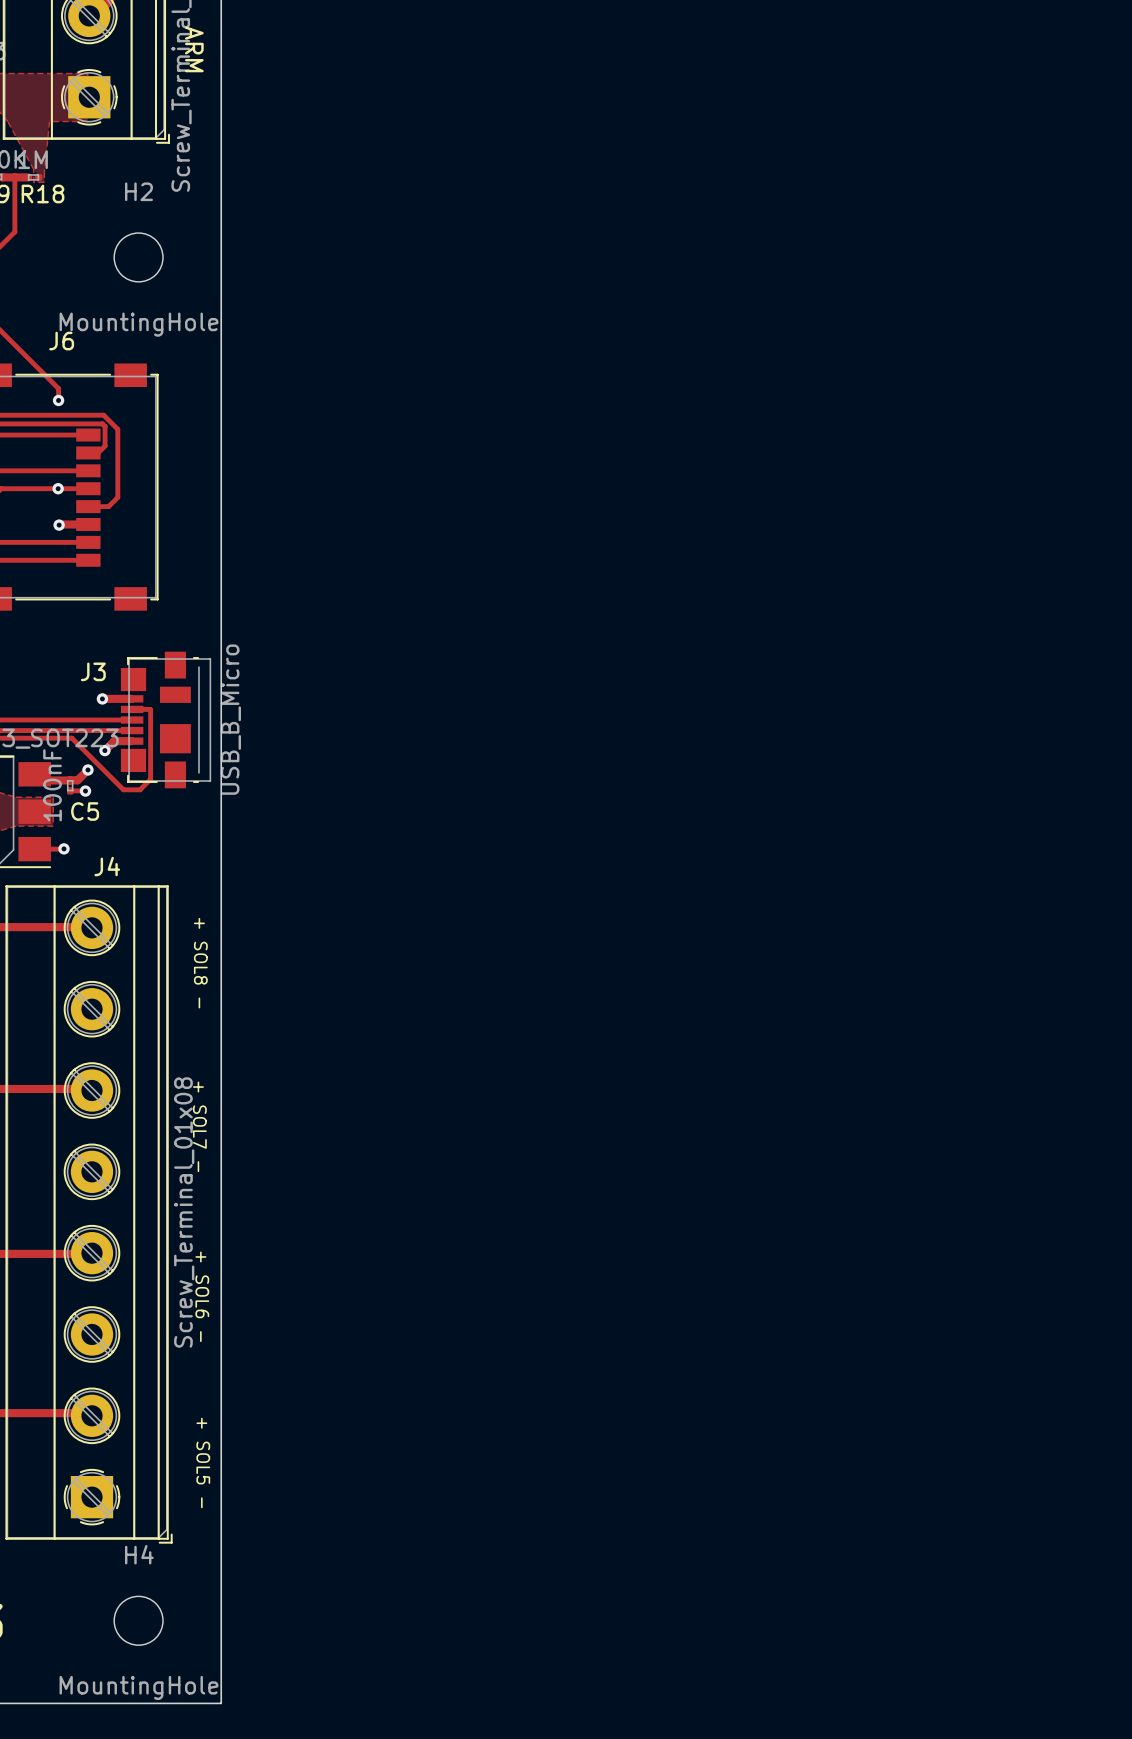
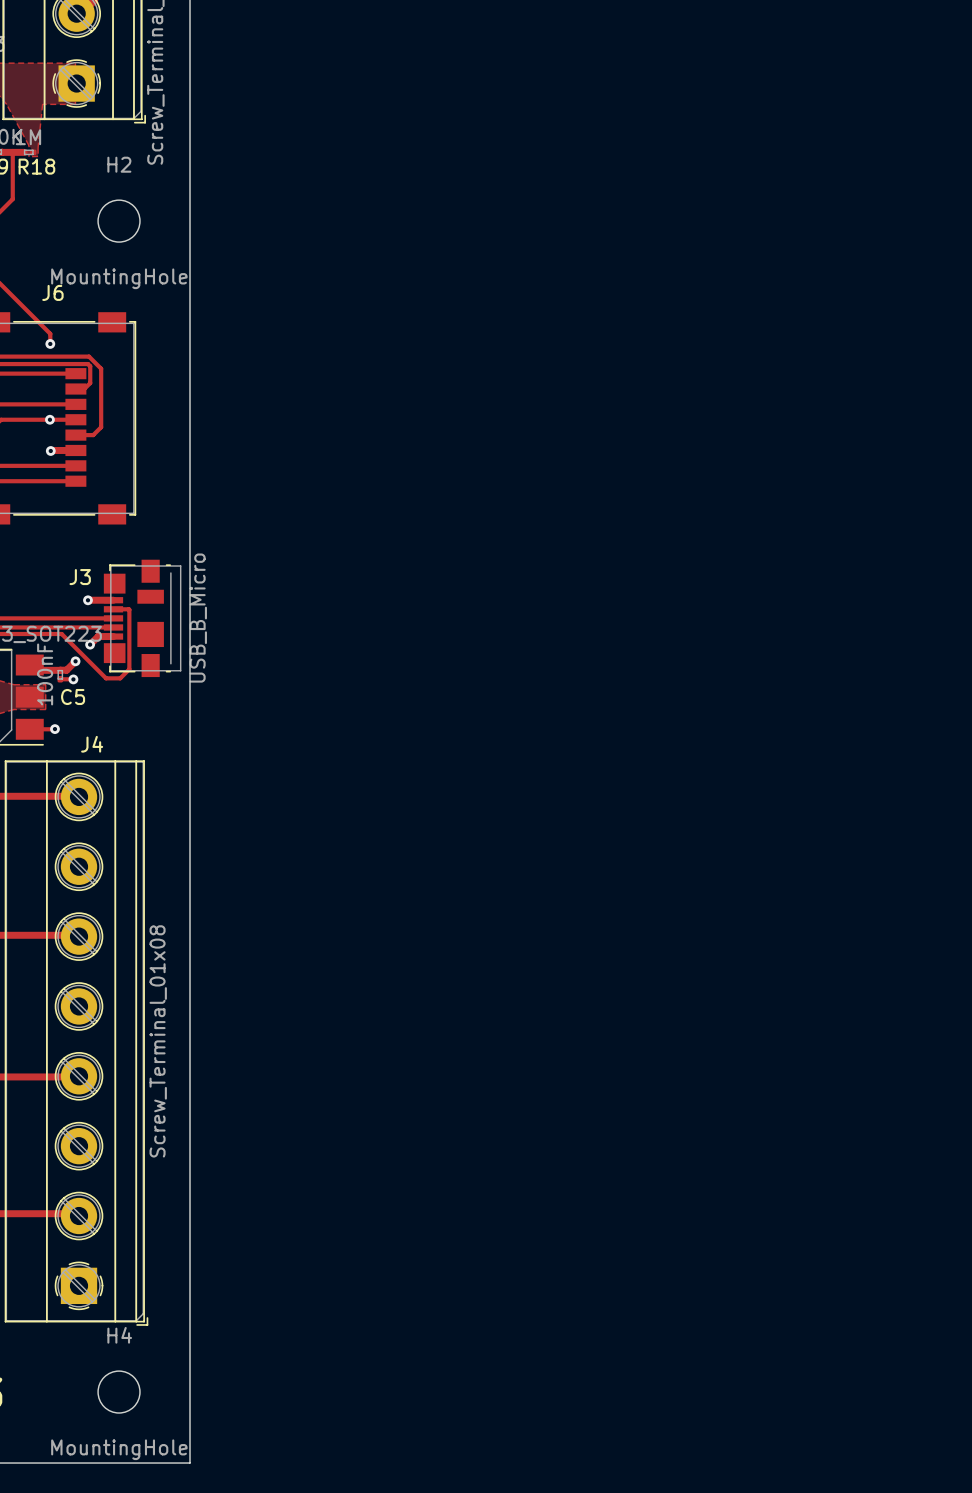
text: ARM (194, 49) -> none
text: + SOL8 - (200, 963) -> none
text: + SOL7 - (199, 1126) -> none
text: + SOL6 - (202, 1296) -> none
text: + SOL5 - (203, 1463) -> none

